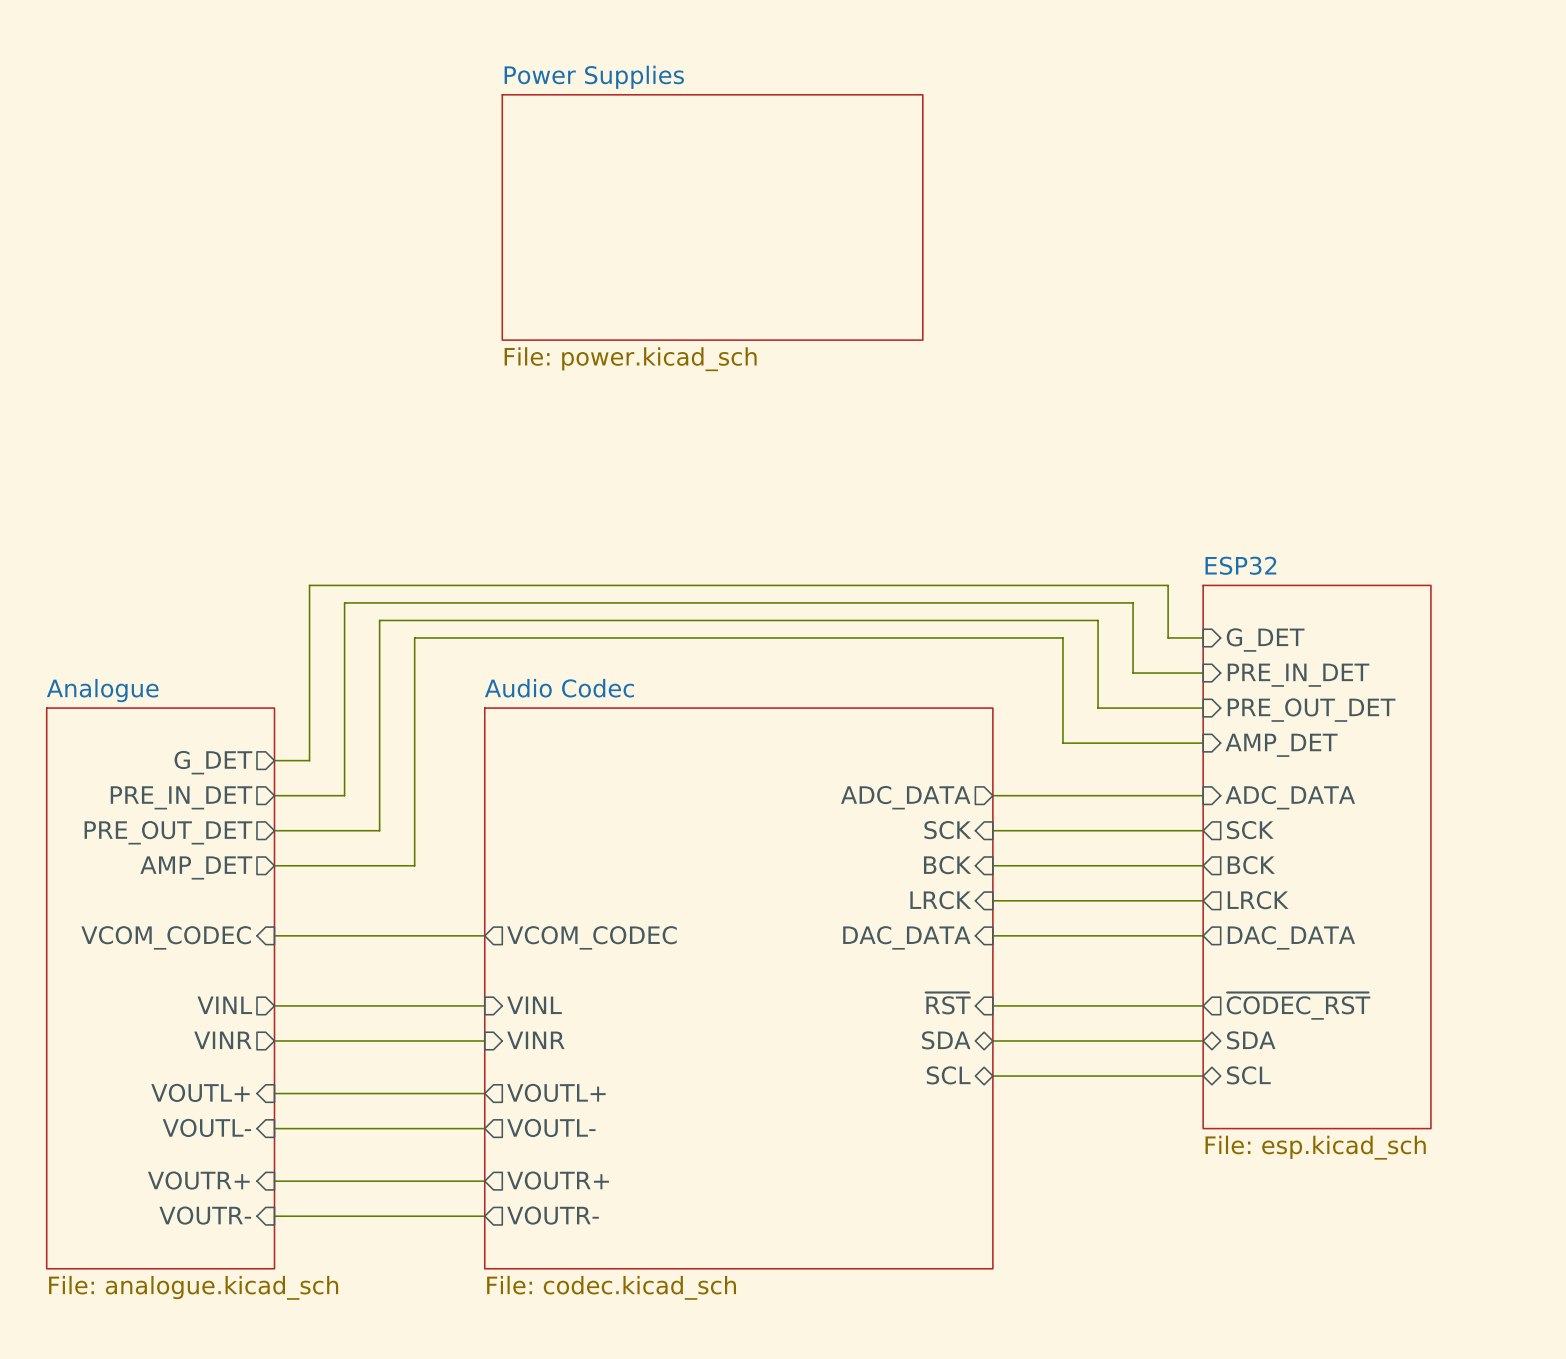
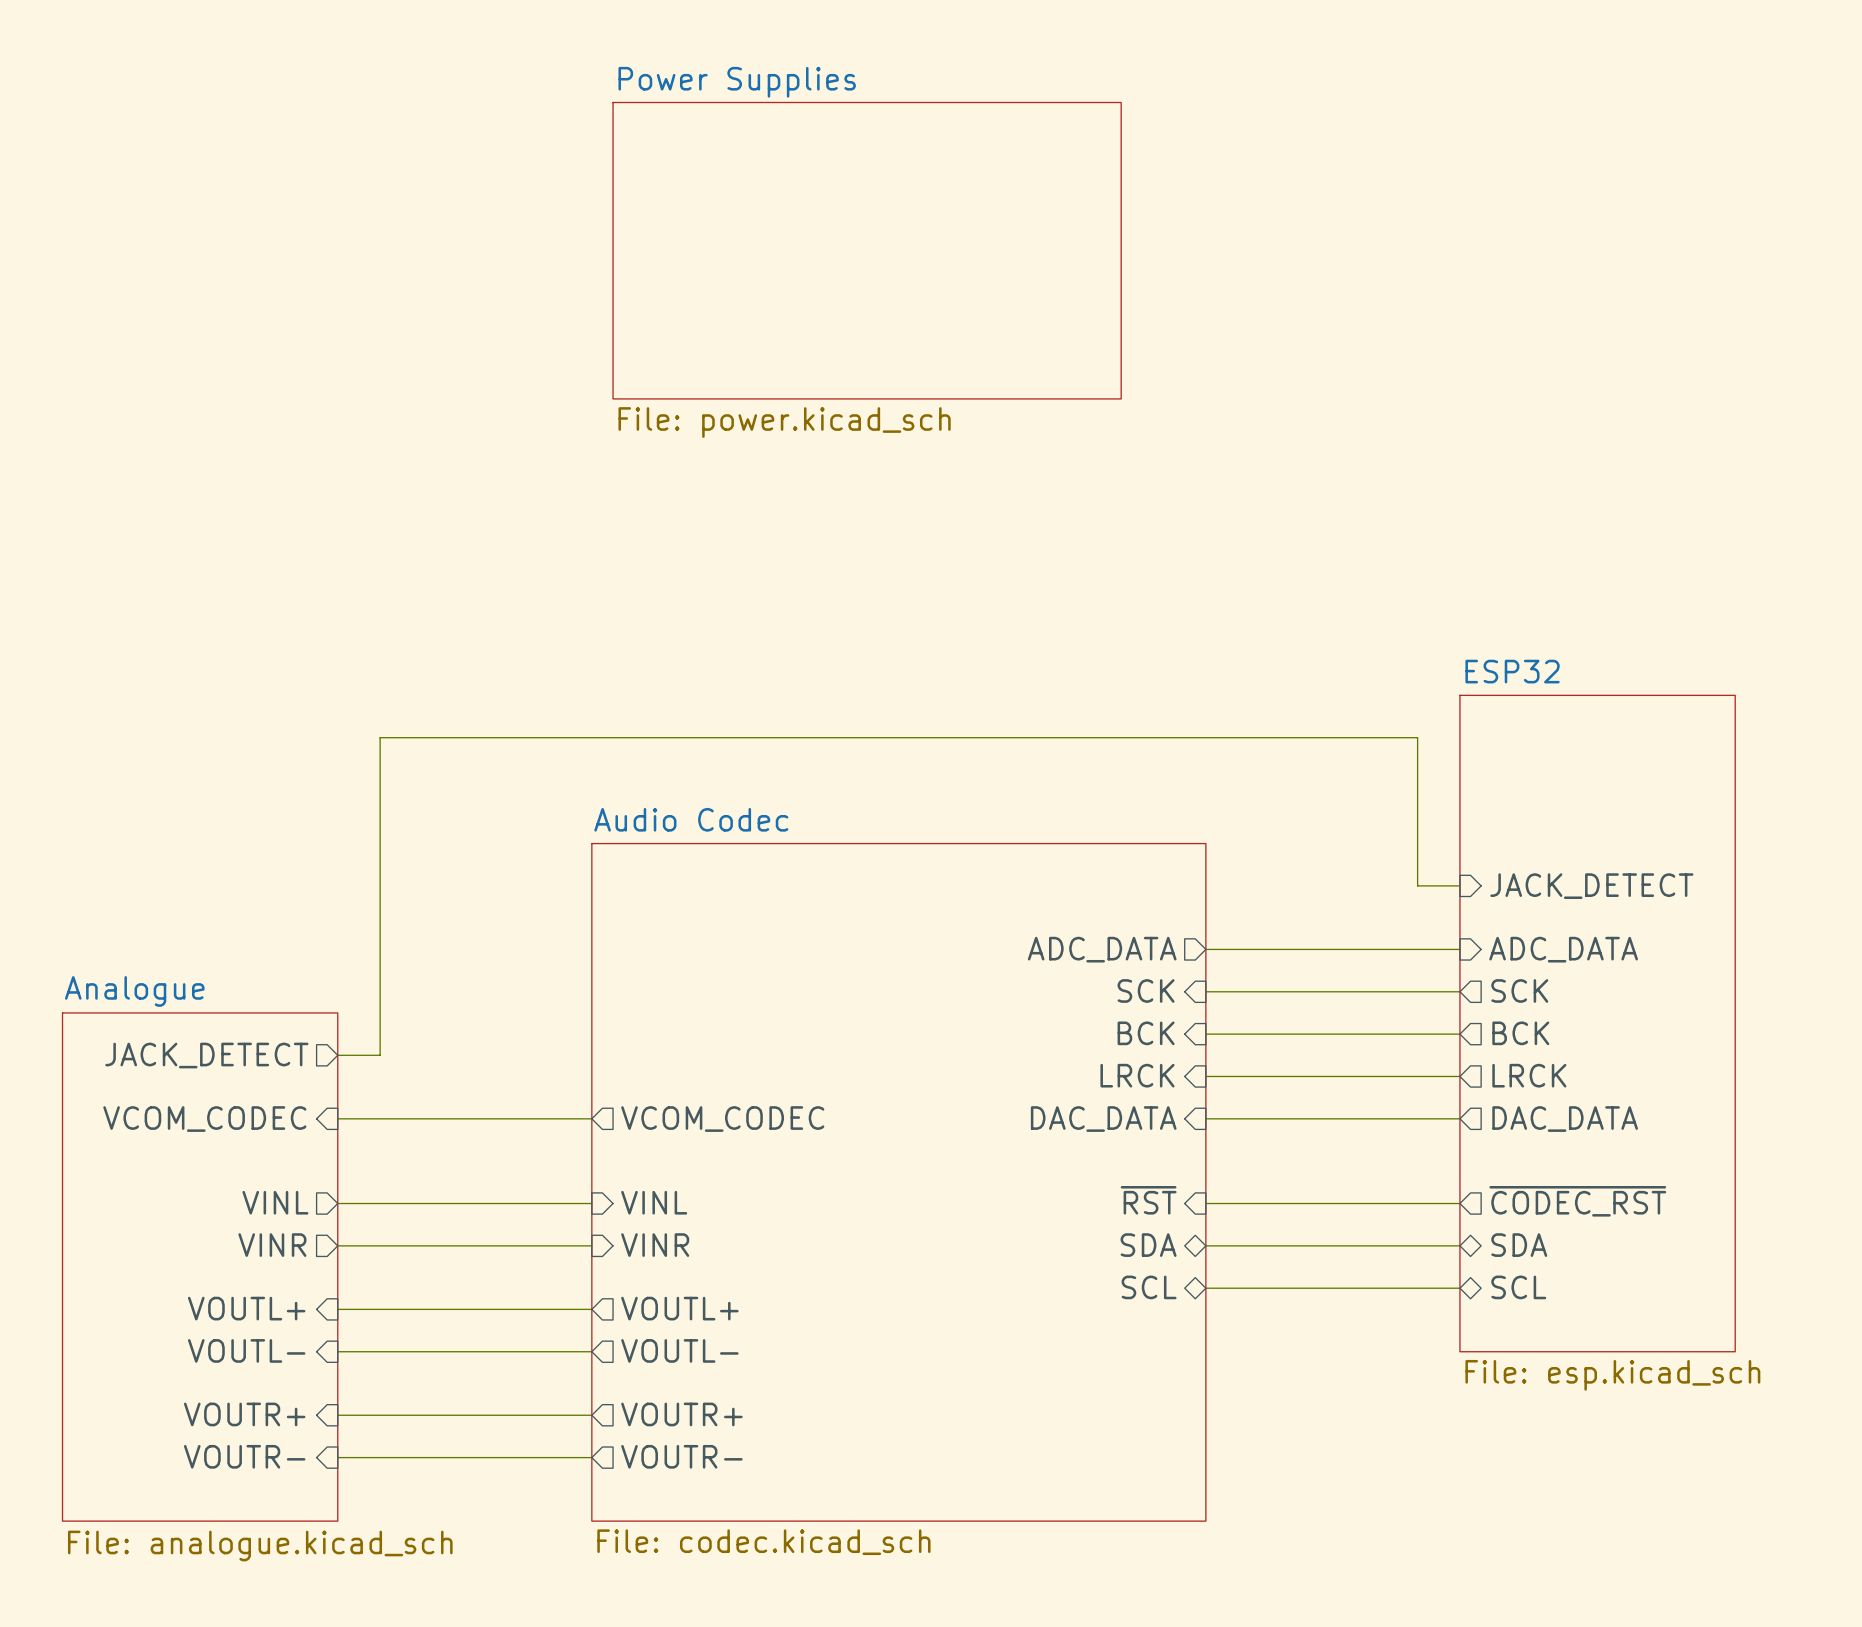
wire: (309, 620) (309, 585) (1168, 585) (1168, 620) -> none
wire: (379, 620) (379, 830) (274, 830) -> (464, 737) (380, 737)
wire: (1098, 620) (1098, 708) (1203, 708) -> (1332, 737) (1417, 737)
wire: (1168, 637) (1203, 637) -> (1417, 758) (1417, 885)
sheet pin: G_DET (1265, 640) -> none
wire: (1203, 673) (1133, 673) (1133, 602) (344, 602) (344, 795) (274, 795) -> none
sheet pin: PRE_IN_DET (1298, 675) -> none
sheet pin: PRE_OUT_DET (1311, 710) -> none
wire: (1168, 743) (1062, 743) (1062, 637) (414, 637) (414, 865) (274, 865) -> none
sheet pin: AMP_DET (1281, 745) -> JACK_DETECT (1591, 886)
wire: (274, 760) (309, 760) -> (337, 1055) (380, 1055) (380, 907)
sheet pin: G_DET (213, 762) -> none
sheet pin: PRE_IN_DET (181, 797) -> none
sheet pin: PRE_OUT_DET (168, 832) -> none
sheet pin: AMP_DET (196, 867) -> none
sheet pin: none -> JACK_DETECT (206, 1055)
sheet Analogue: File: analogue.kicad_sch (160, 988) -> none
sheet Analogue: none -> File: analogue.kicad_sch (200, 1267)

